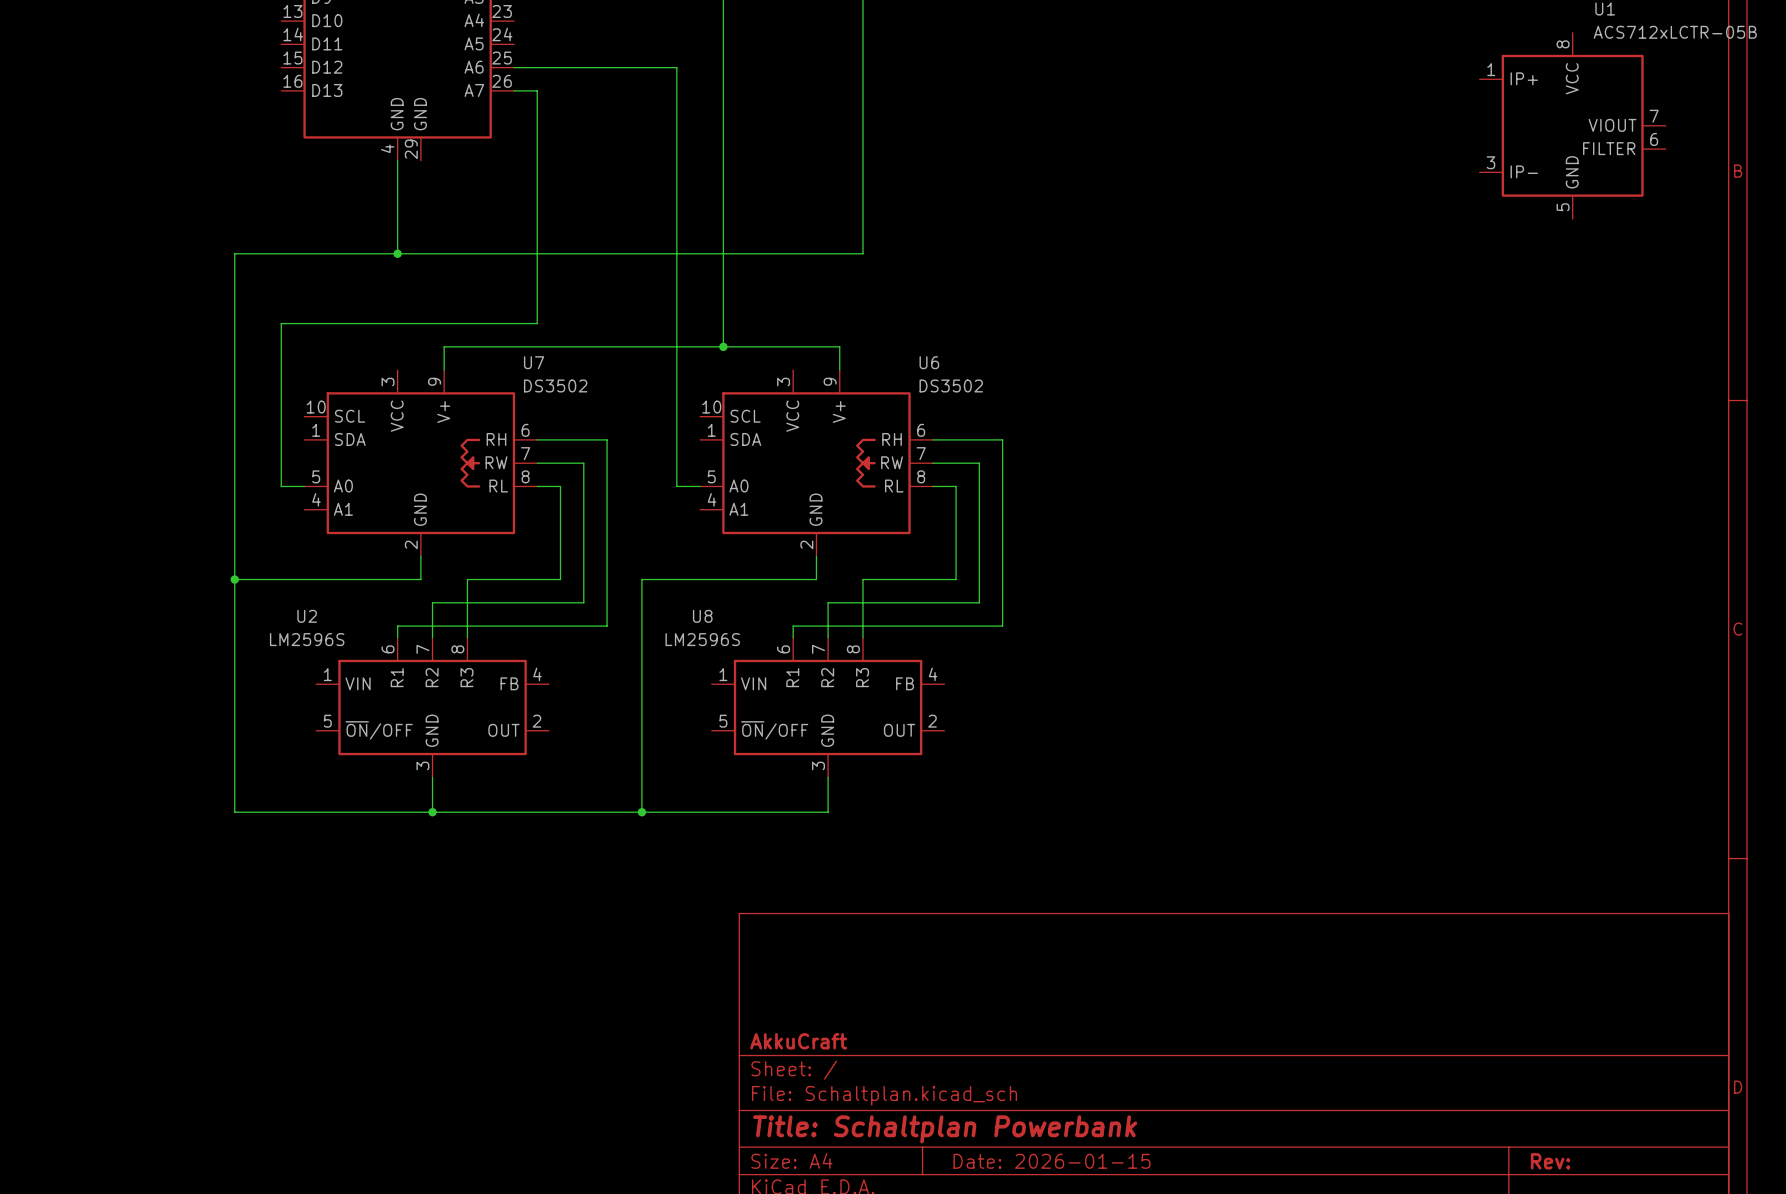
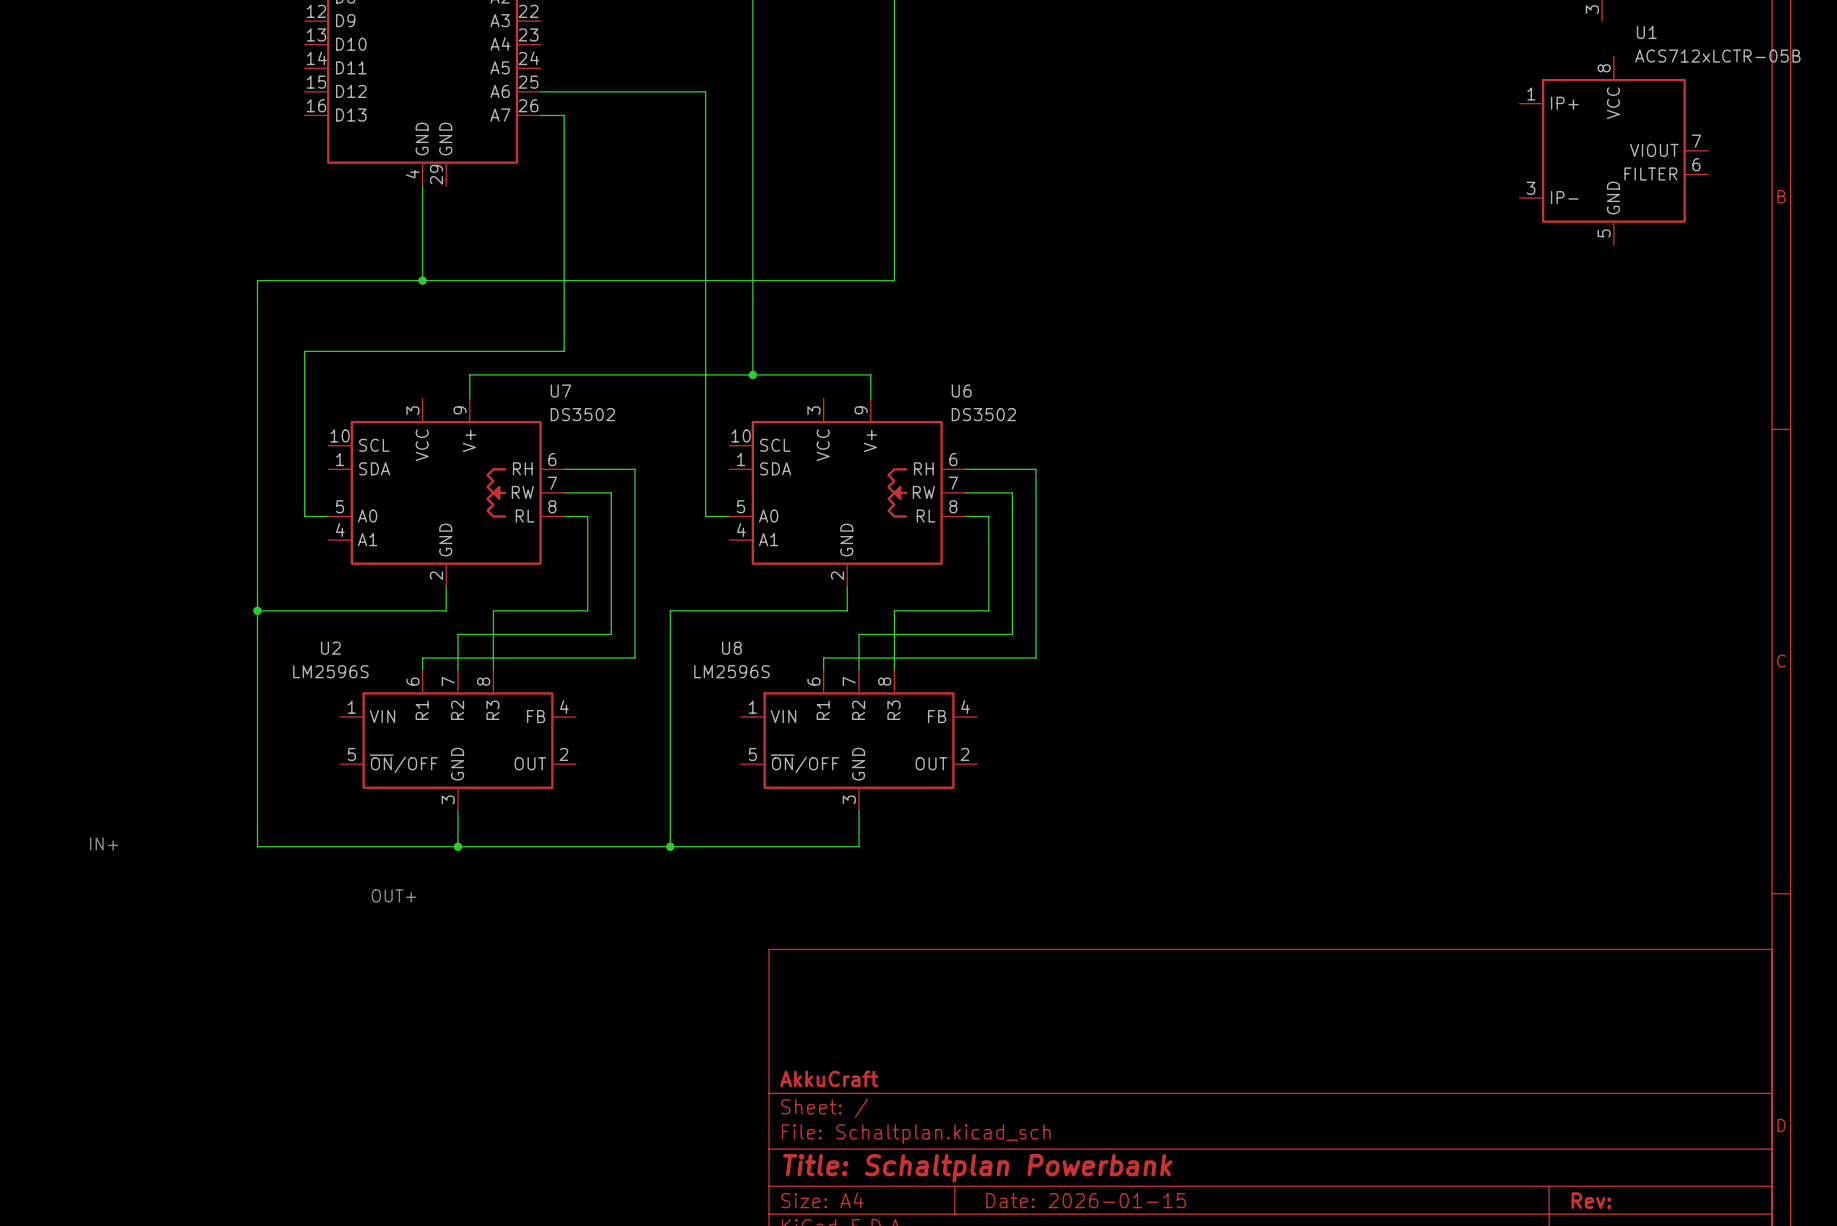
text: none -> IN+ (104, 843)
text: none -> OUT+ (394, 895)

